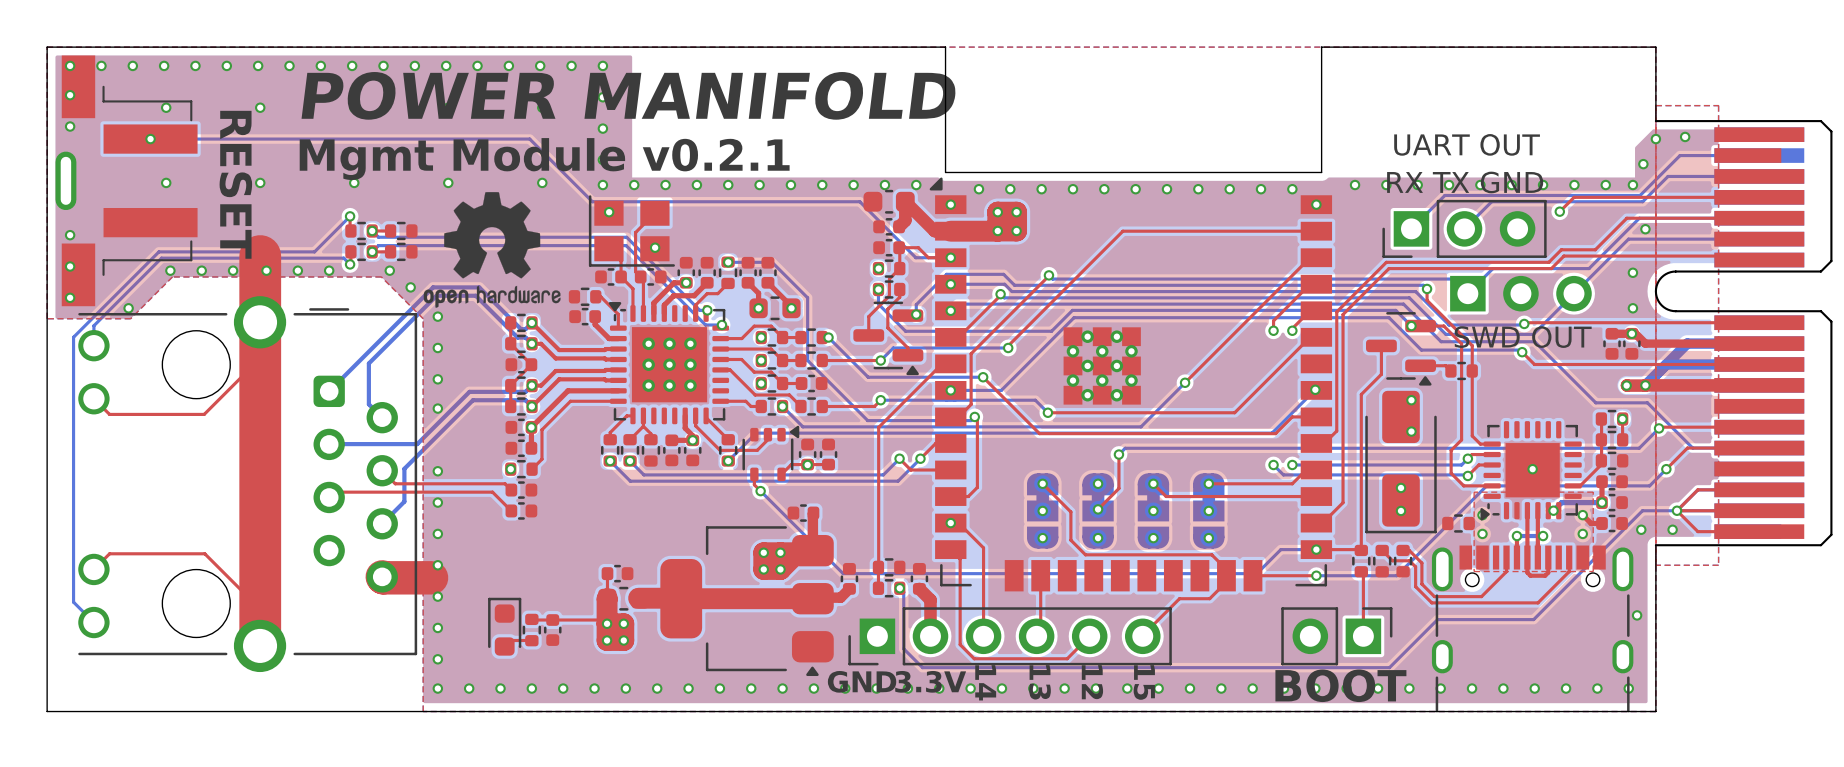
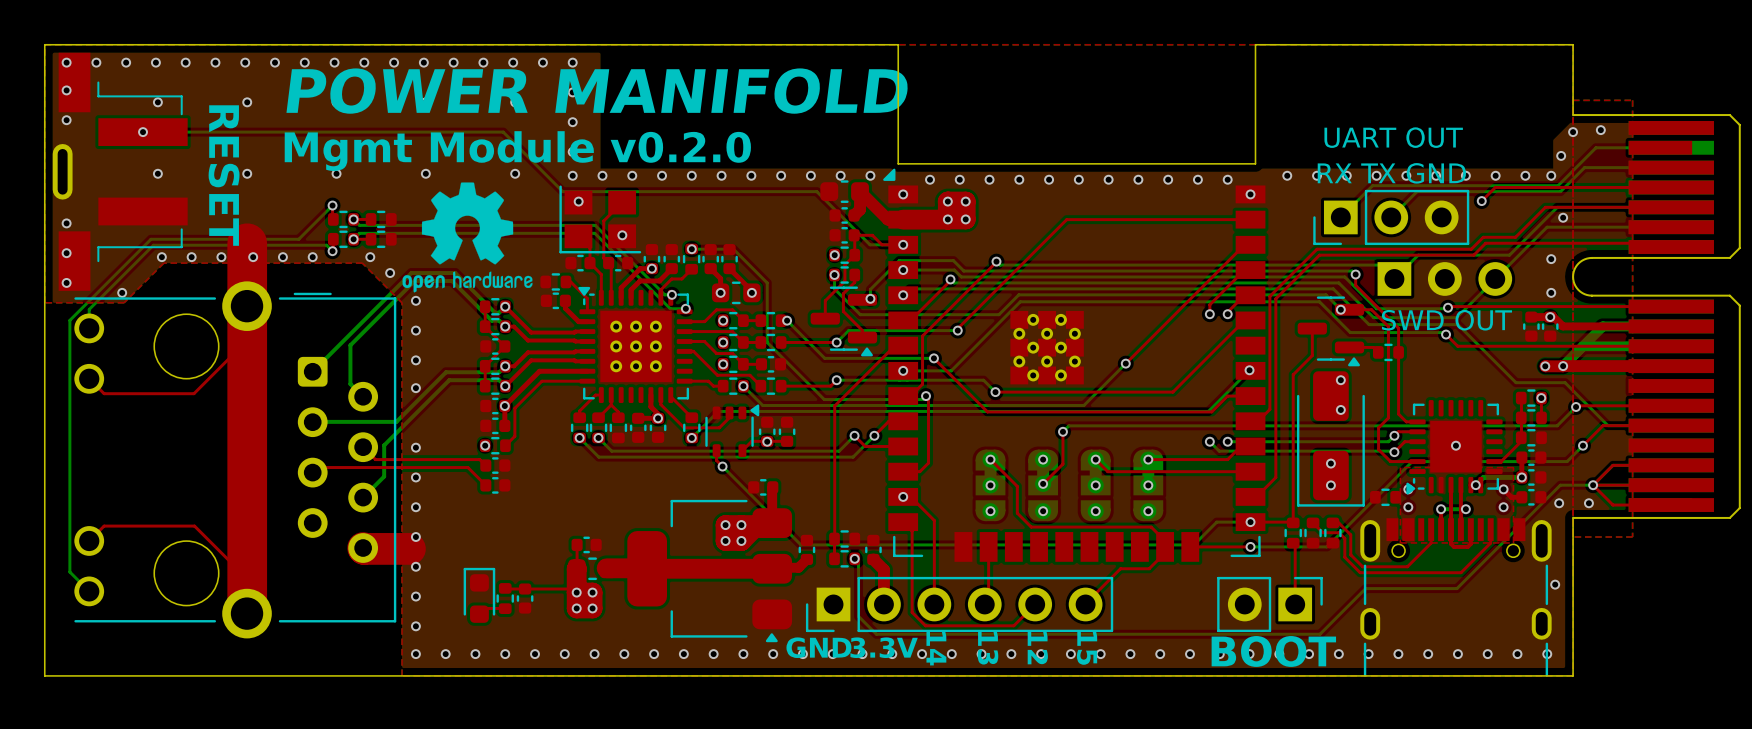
text: Mgmt Module v0.2.1 (544, 159) -> Mgmt Module v0.2.0 (517, 151)

